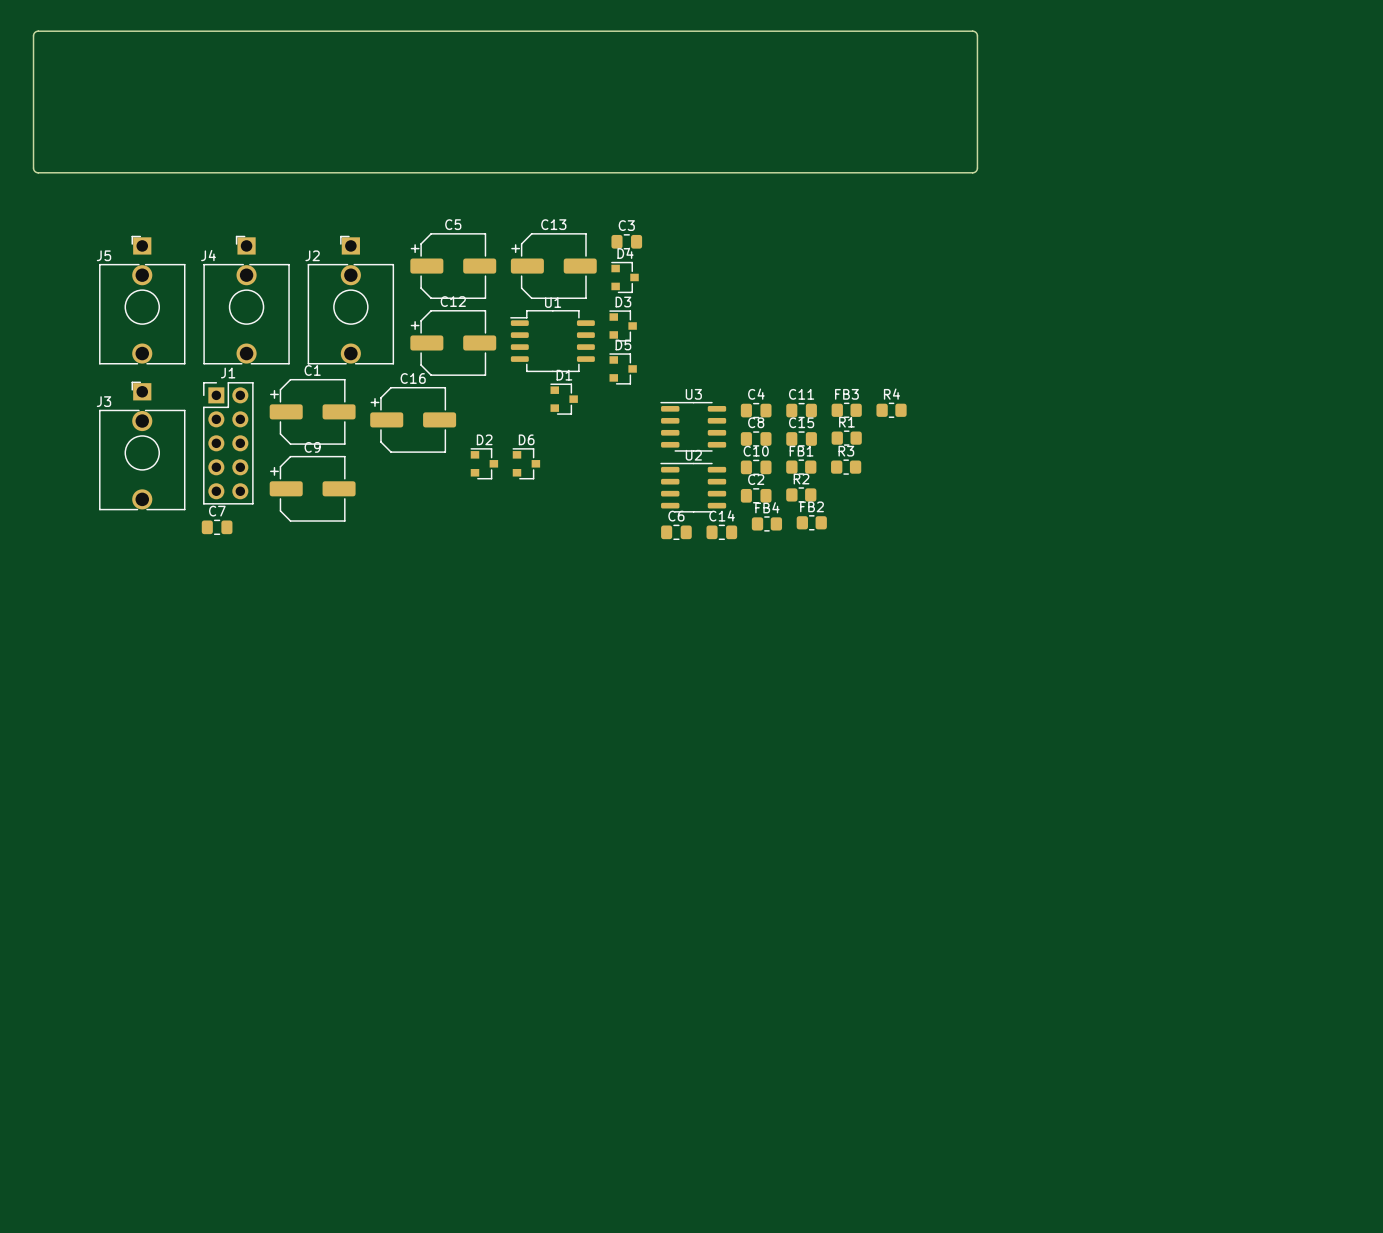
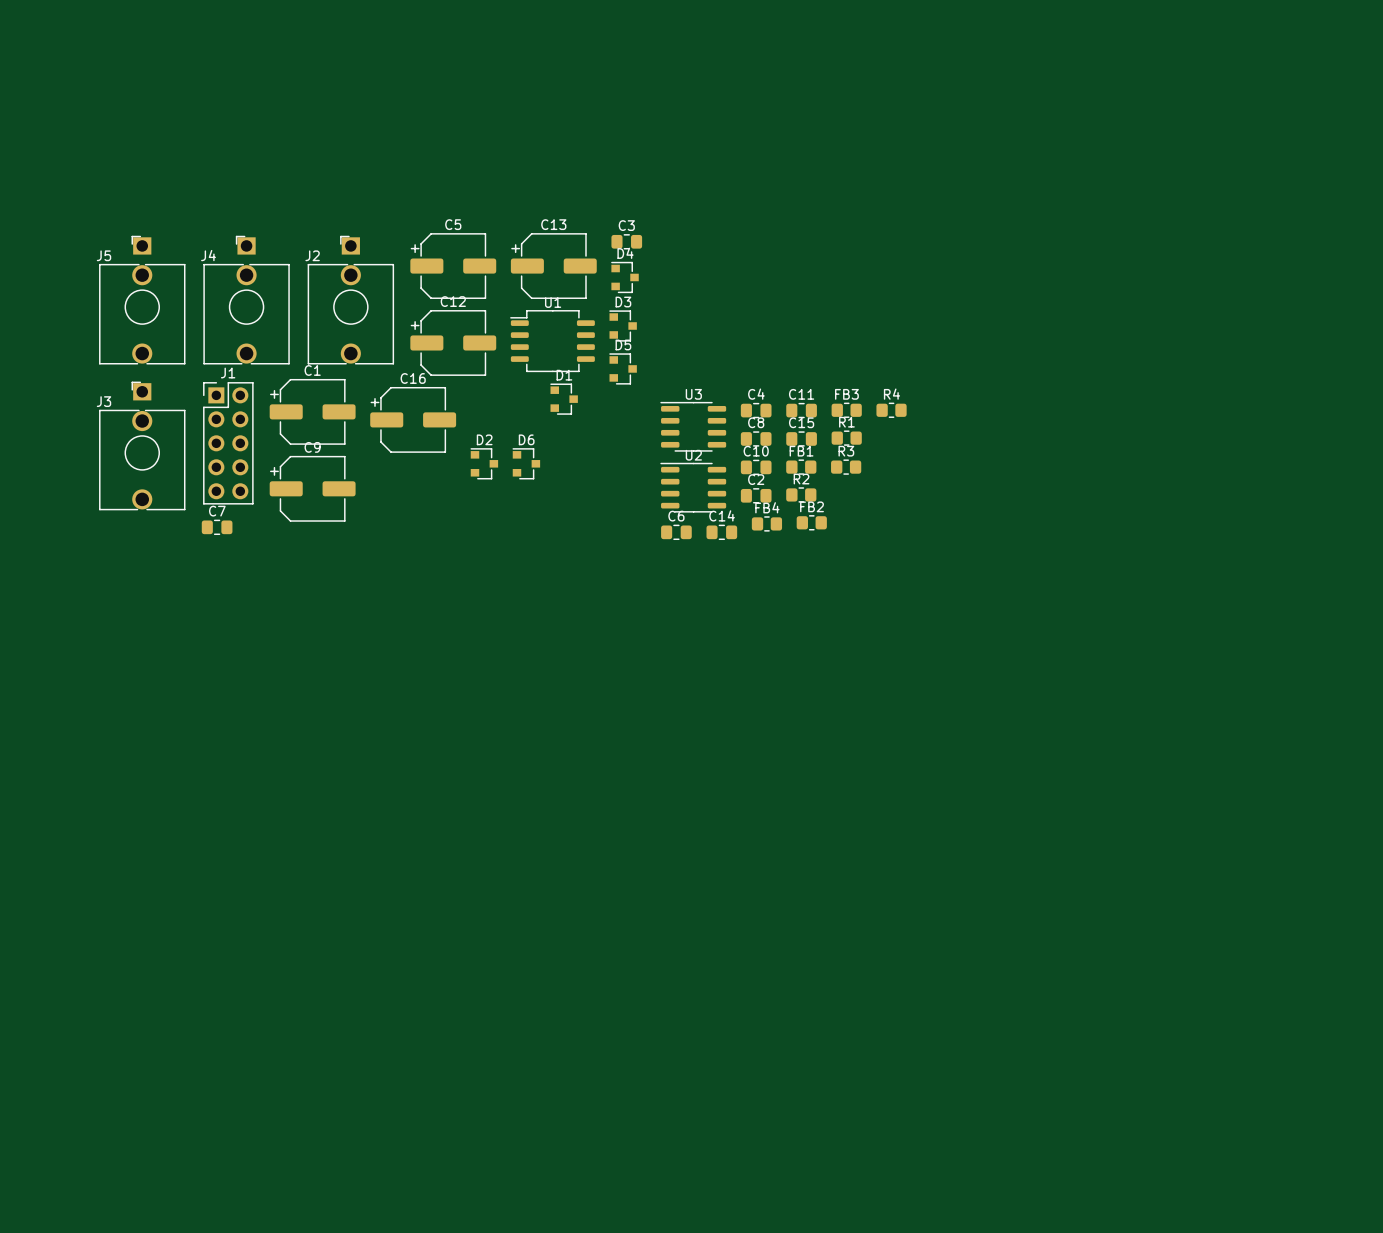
board edge: (38, 31) (973, 31) (977, 35) (977, 168) (972, 172) (37, 172) (33, 168) (33, 35) (38, 31) -> none

